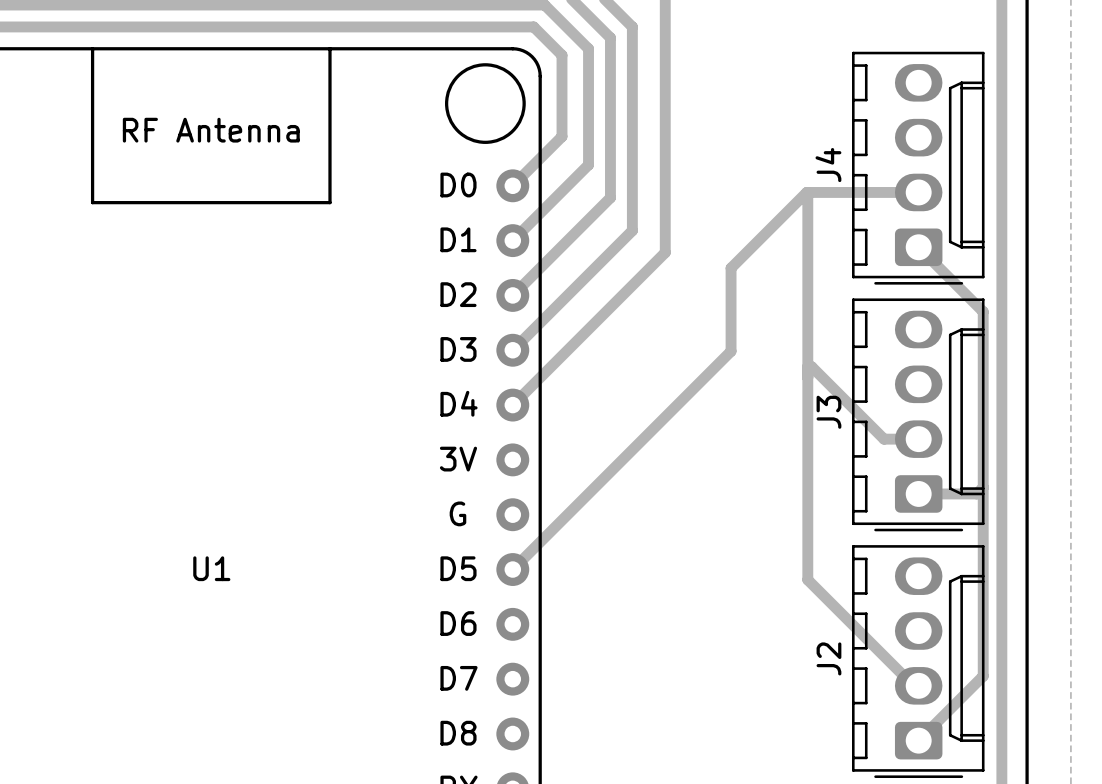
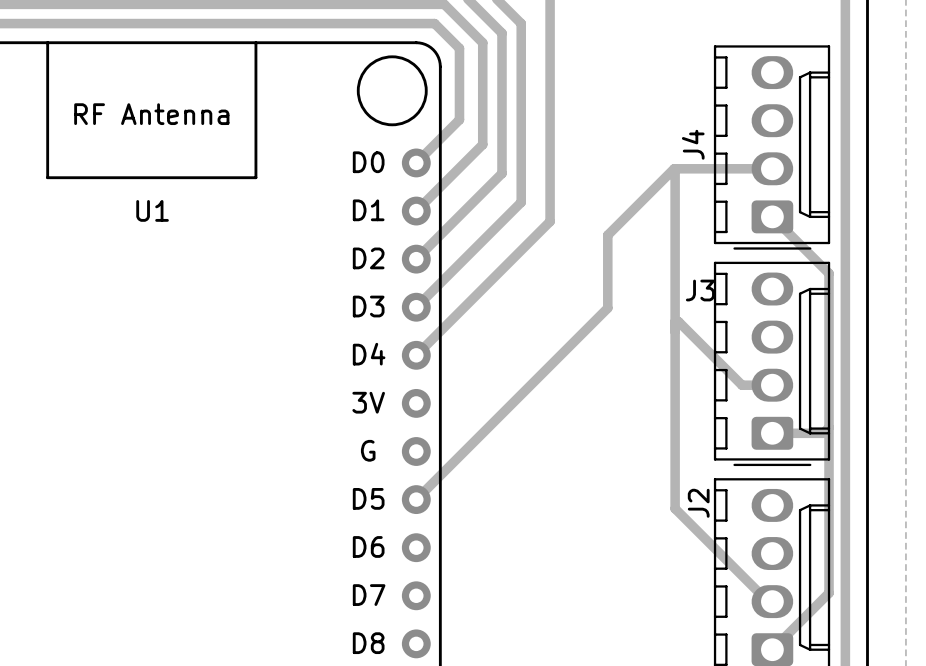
J3 name rotation: 0° (828, 412) -> 90° clockwise (700, 290)
J3 name position: J3 (828, 412) -> J3 (700, 290)
U1 name position: U1 (211, 568) -> U1 (152, 210)
J2 name position: J2 (828, 658) -> J2 (698, 503)

